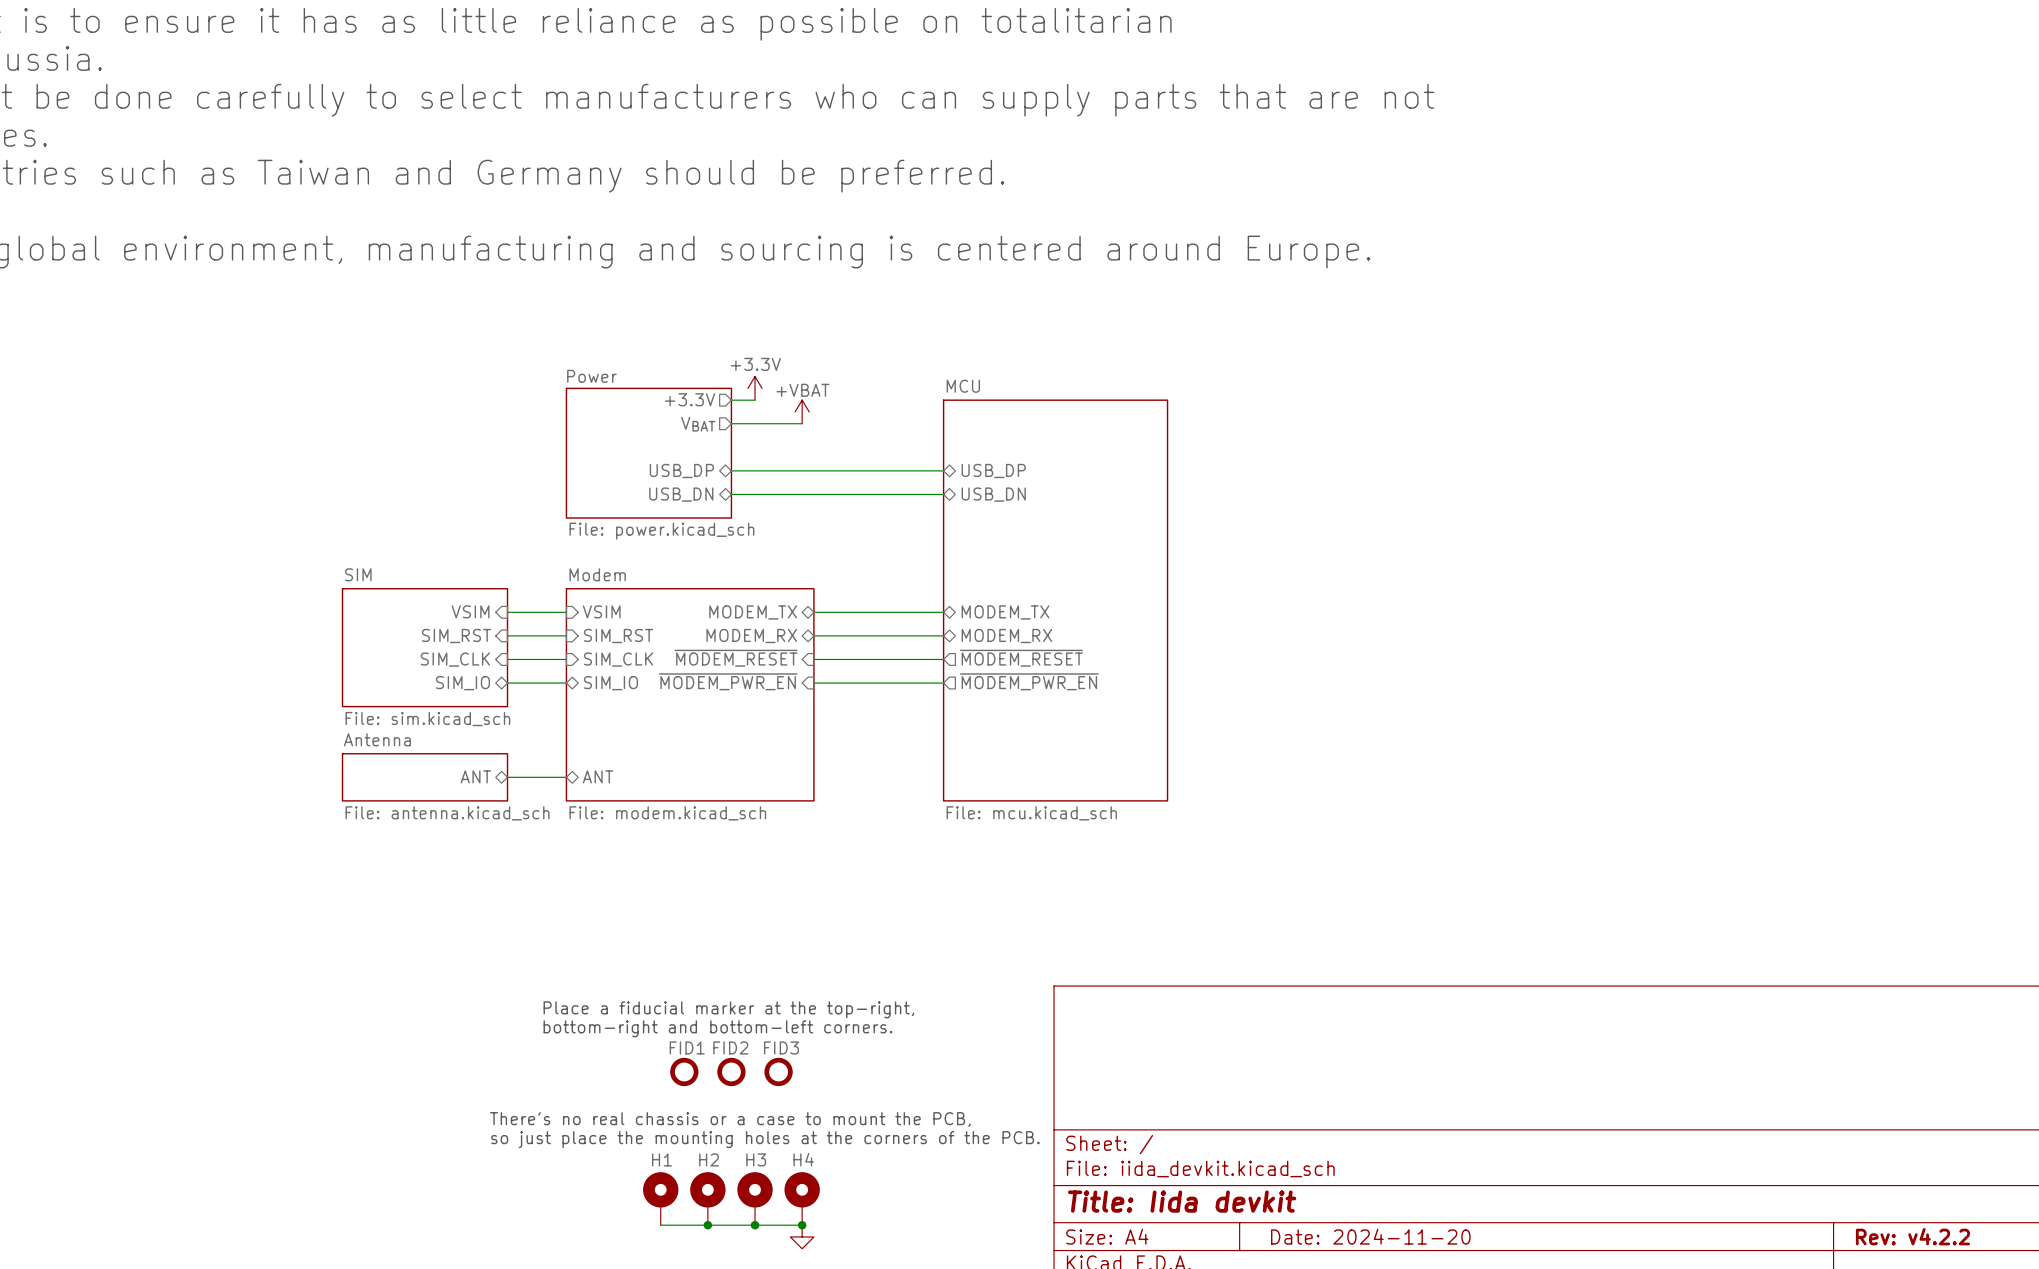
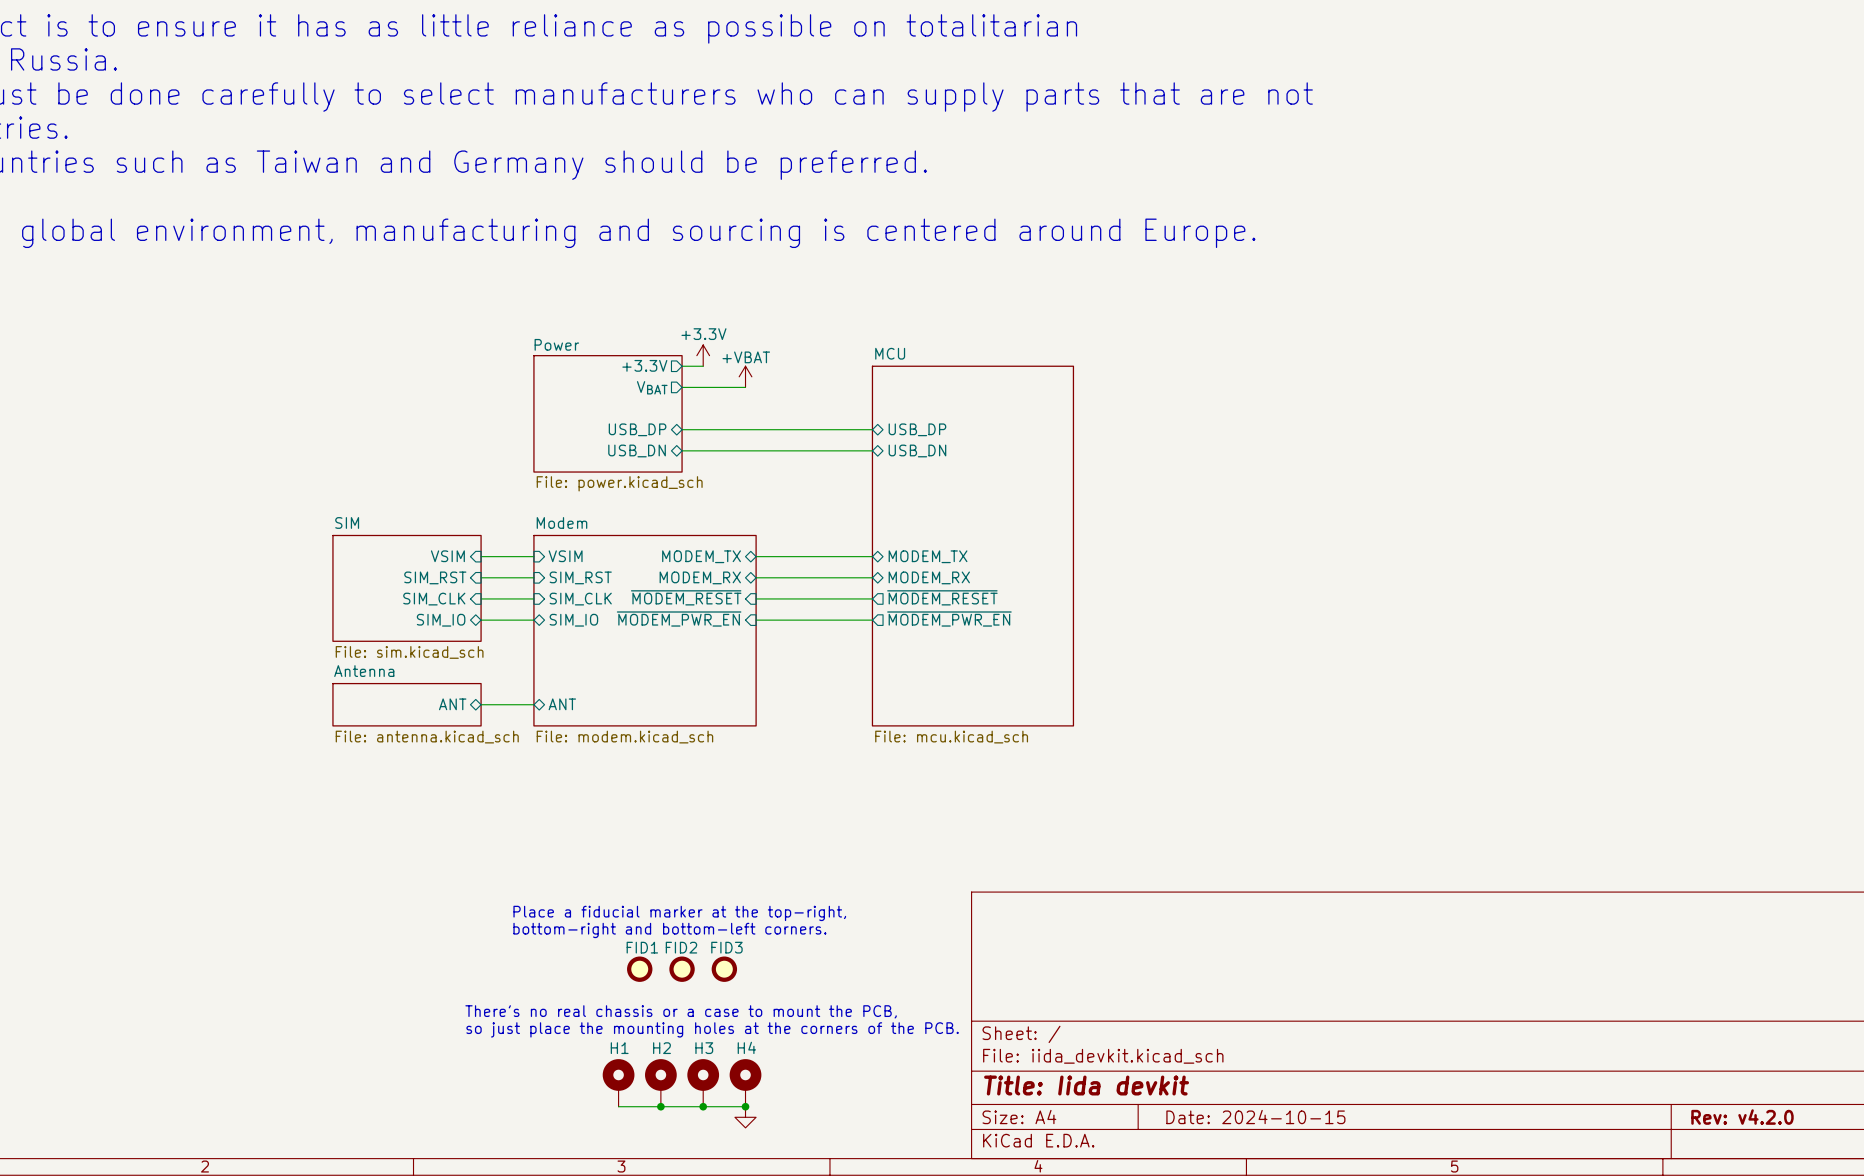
title block: Date: 2024-11-20 (1370, 1236) -> Date: 2024-10-15 (1255, 1117)
title block: Rev: v4.2.2 (1912, 1236) -> Rev: v4.2.0 (1742, 1117)

